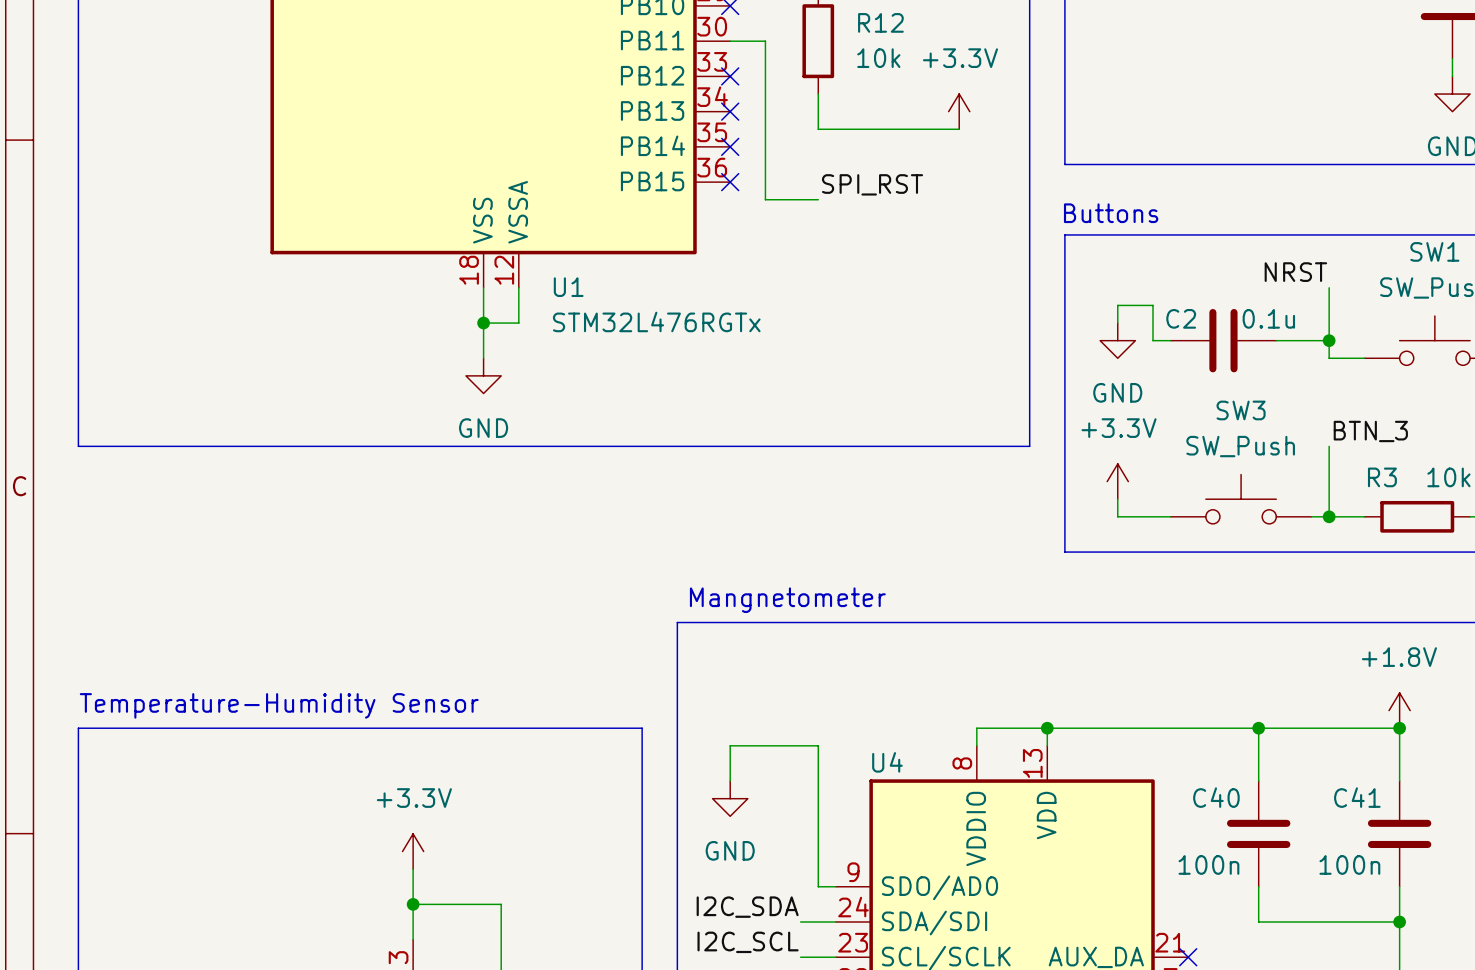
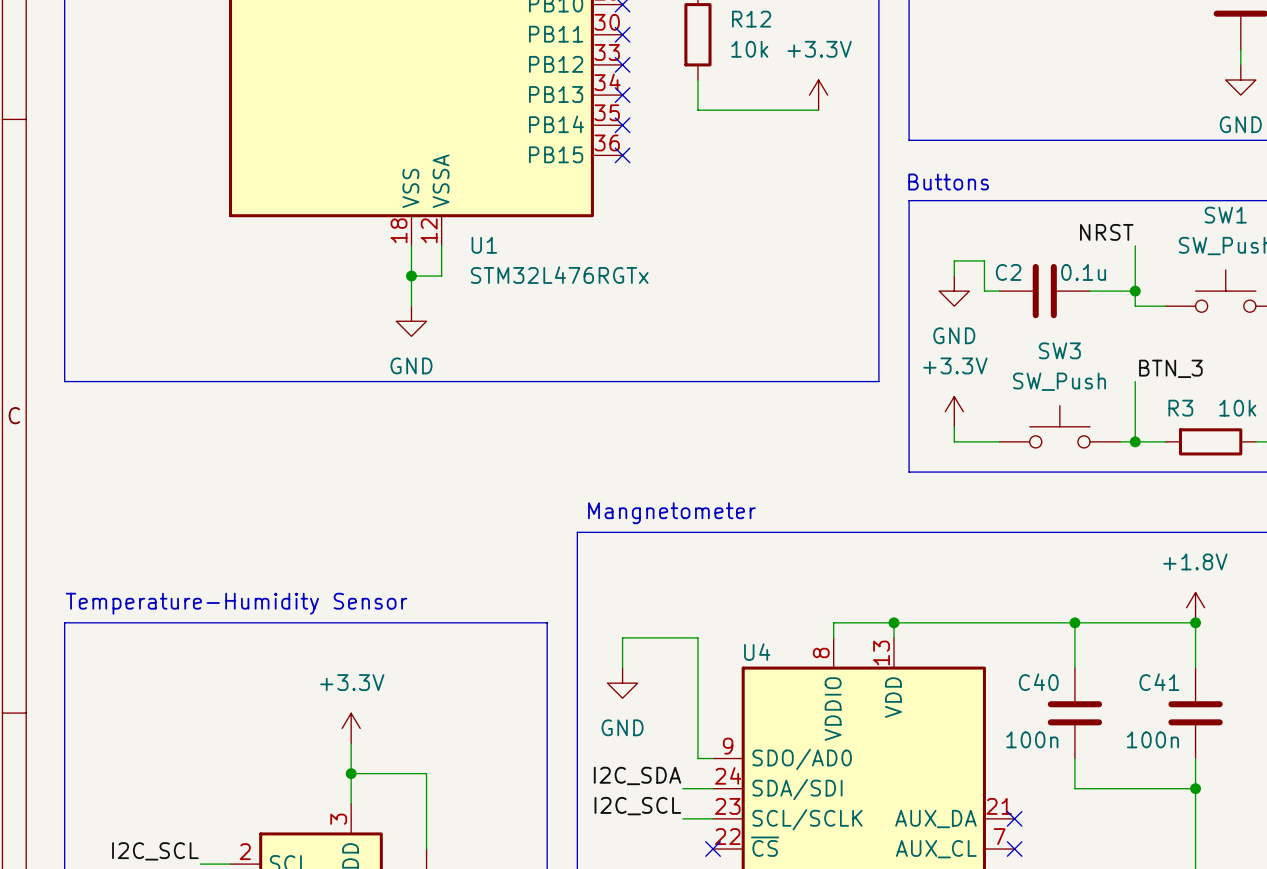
wire: (730, 41) (765, 41) (765, 199) (818, 199) -> none
no-connect mark: none -> (622, 34)
label: SPI_RST (872, 184) -> none

